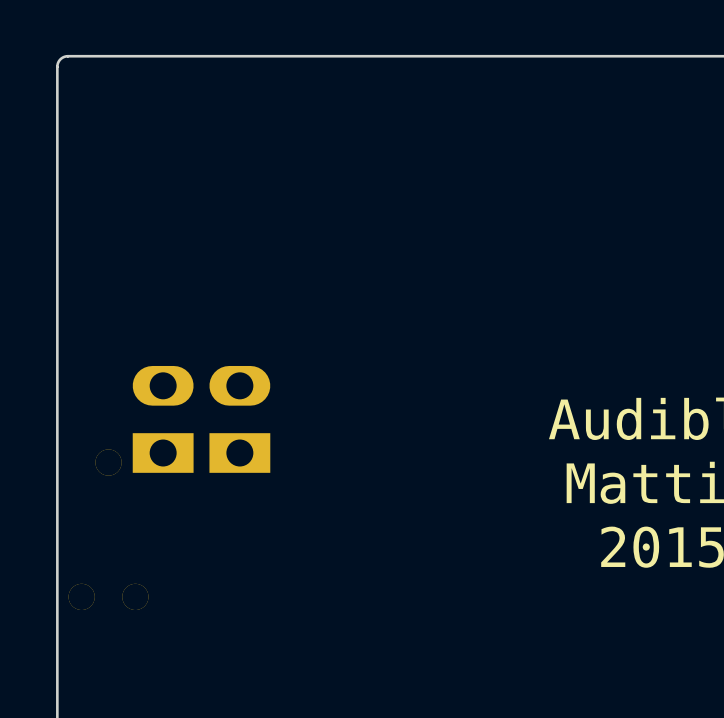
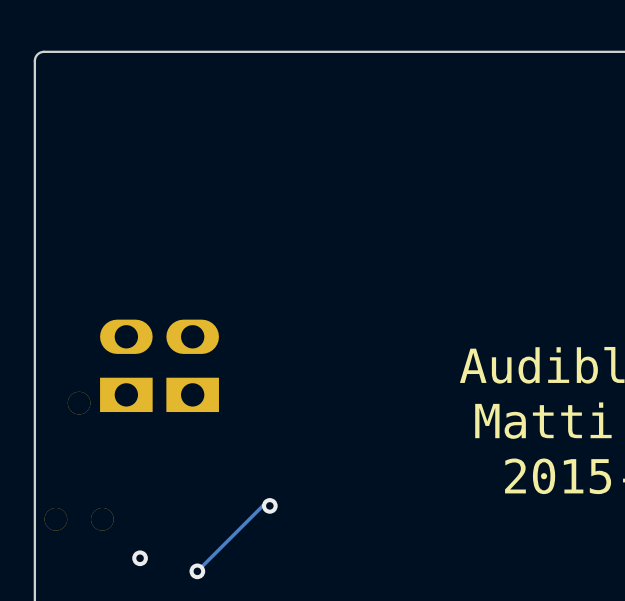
track: none -> (269, 505) (262, 505) (197, 571)
via: none -> (269, 505)
via: none -> (140, 558)
via: none -> (197, 571)

